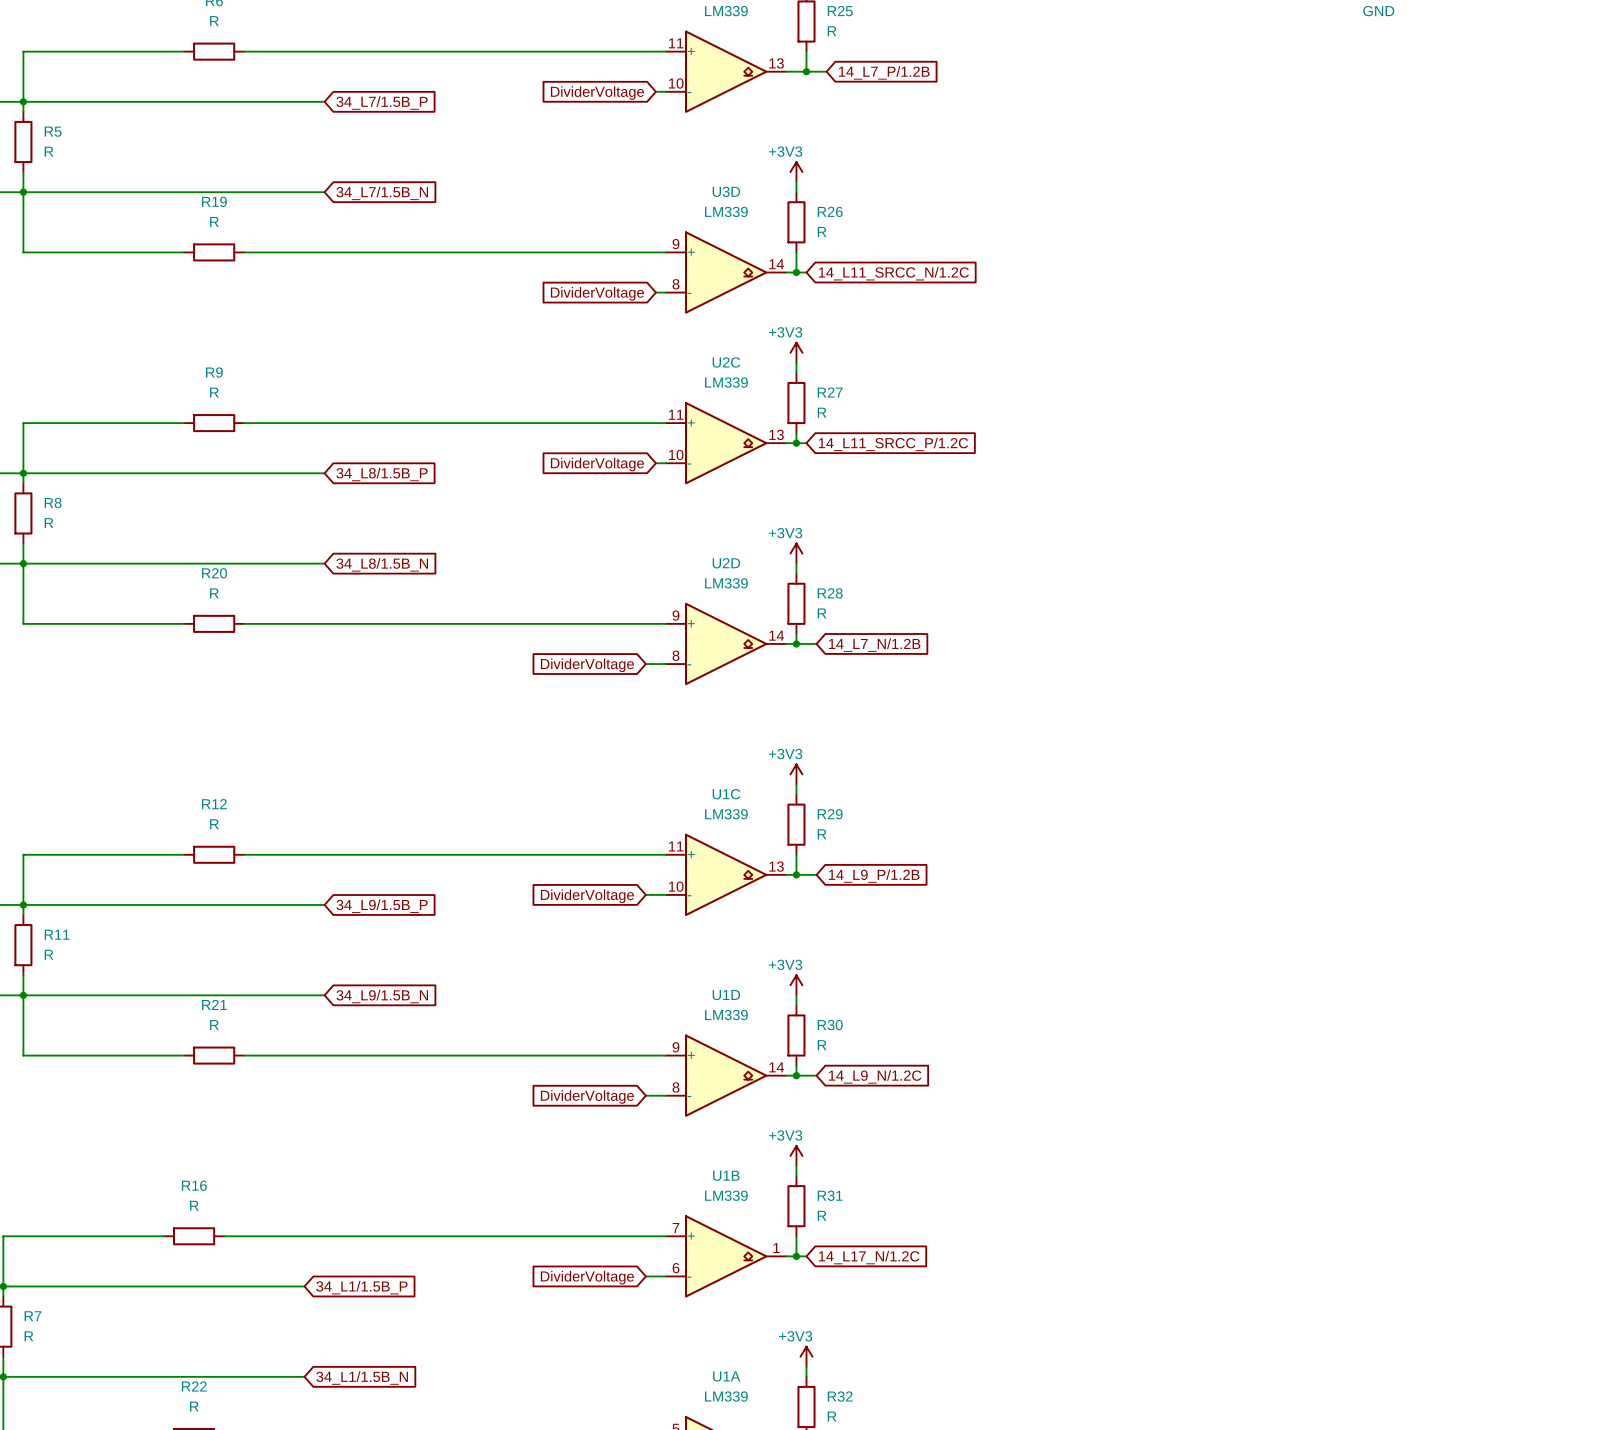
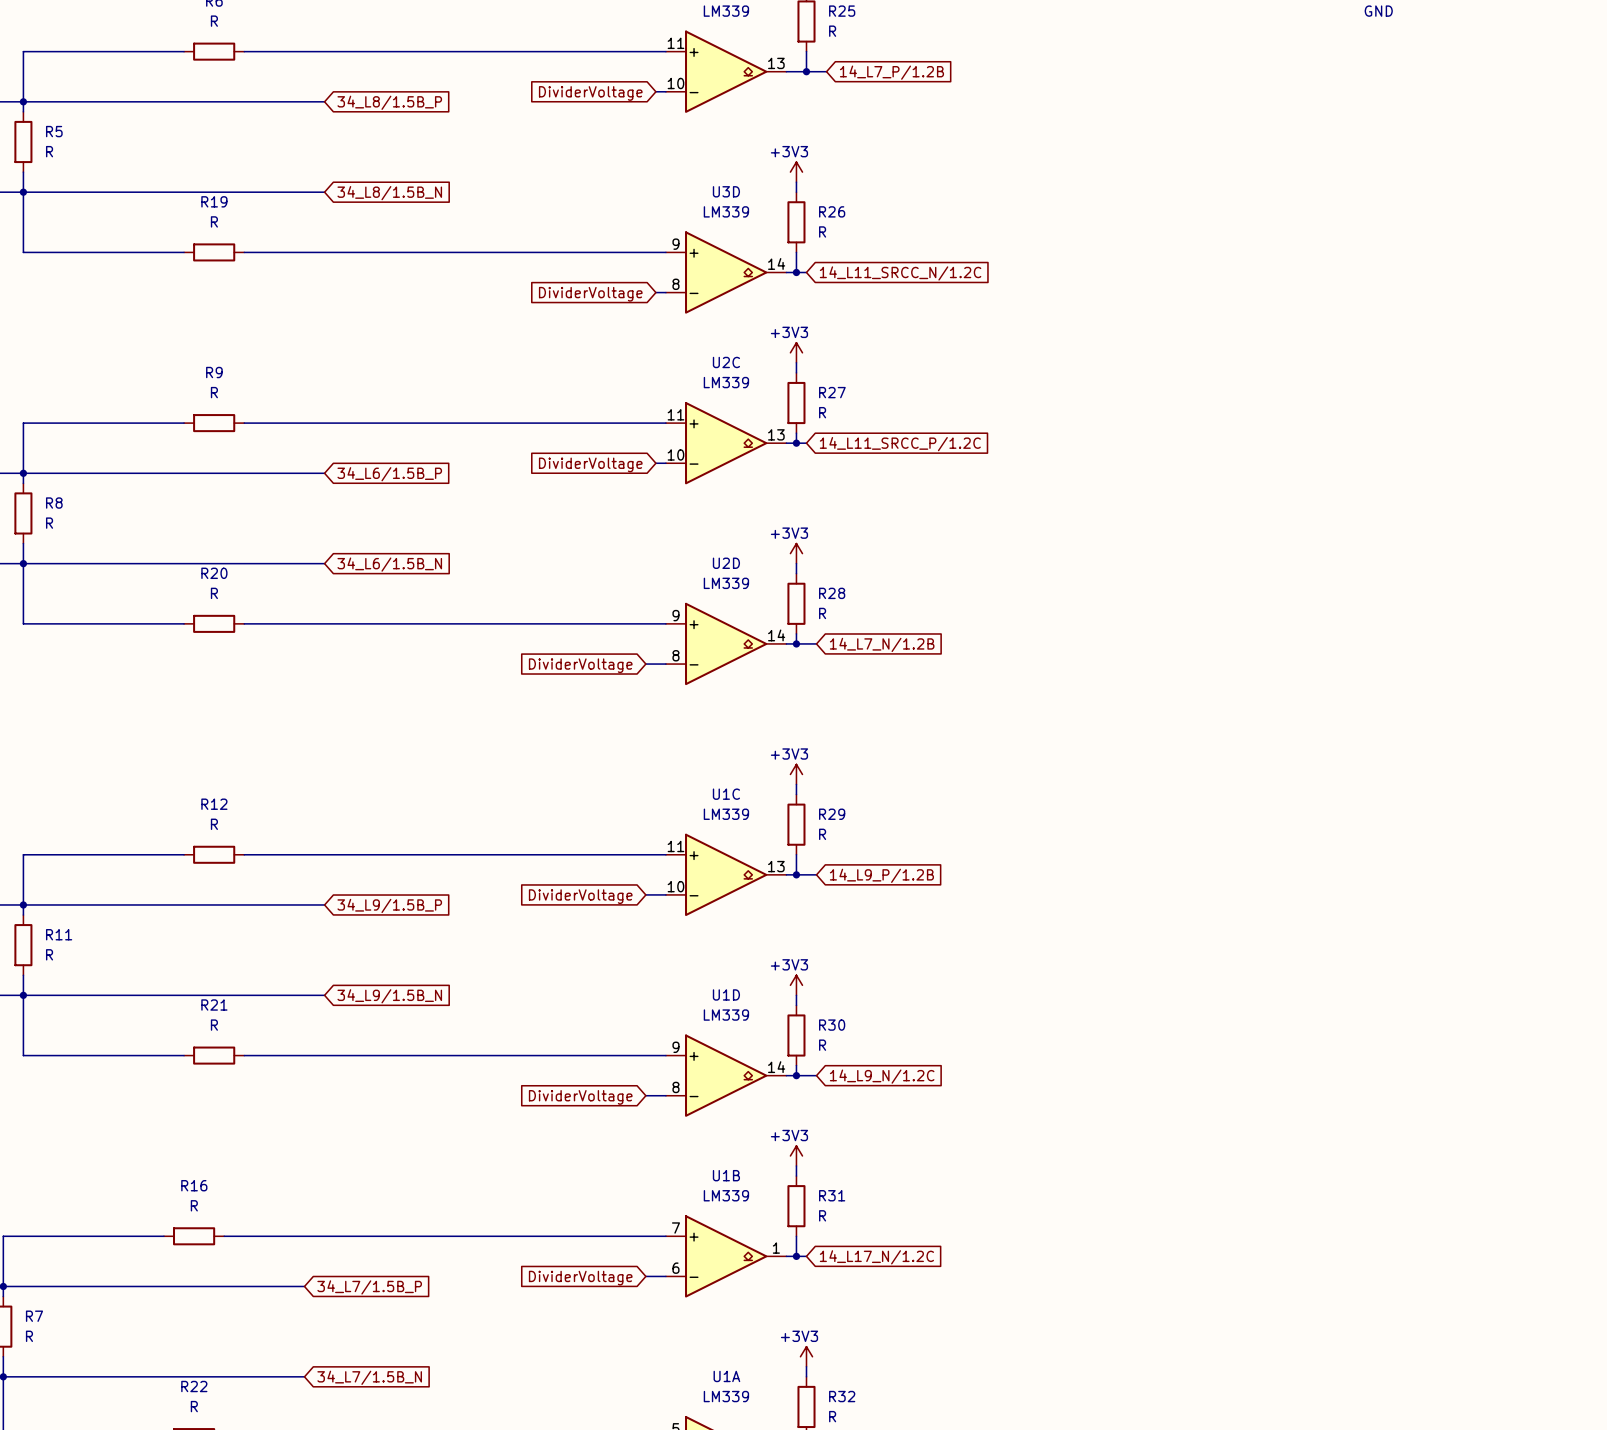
global label: 34_L7/1.5B_P (382, 103) -> 34_L8/1.5B_P (389, 102)
global label: 34_L7/1.5B_N (382, 193) -> 34_L8/1.5B_N (389, 193)
global label: 34_L8/1.5B_P (382, 474) -> 34_L6/1.5B_P (389, 474)
global label: 34_L8/1.5B_N (382, 564) -> 34_L6/1.5B_N (389, 564)
global label: 34_L1/1.5B_P (361, 1287) -> 34_L7/1.5B_P (369, 1287)
global label: 34_L1/1.5B_N (362, 1378) -> 34_L7/1.5B_N (369, 1377)

